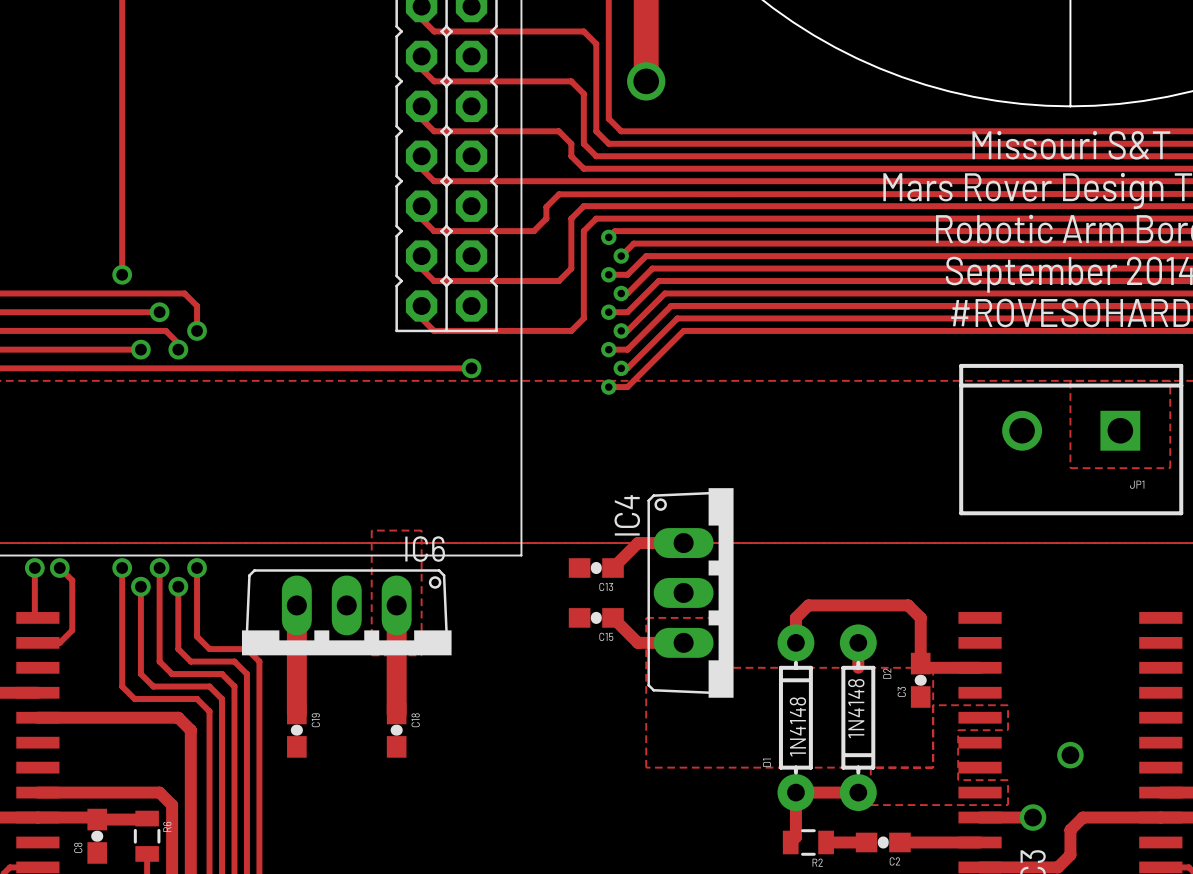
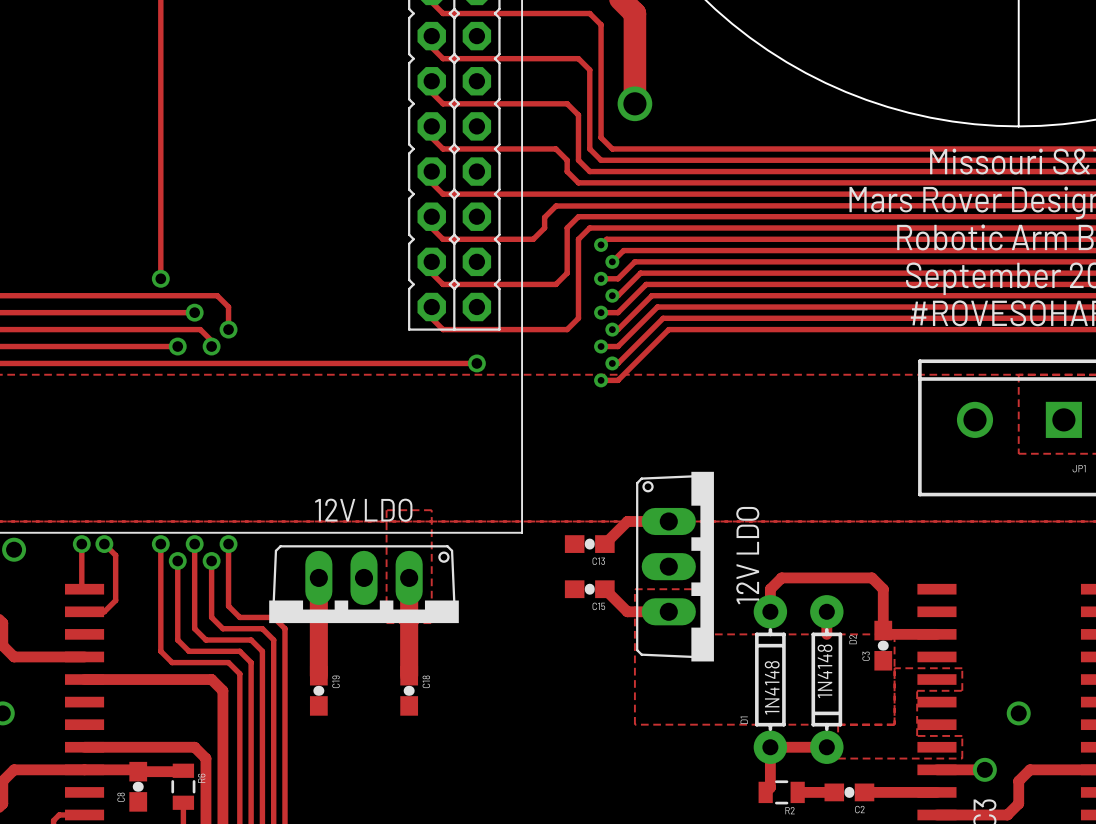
IC4 name: IC4 (627, 515) -> none
text: none -> 12V LDO (363, 510)
IC6 name: IC6 (425, 549) -> none
text: none -> 12V LDO (747, 555)

